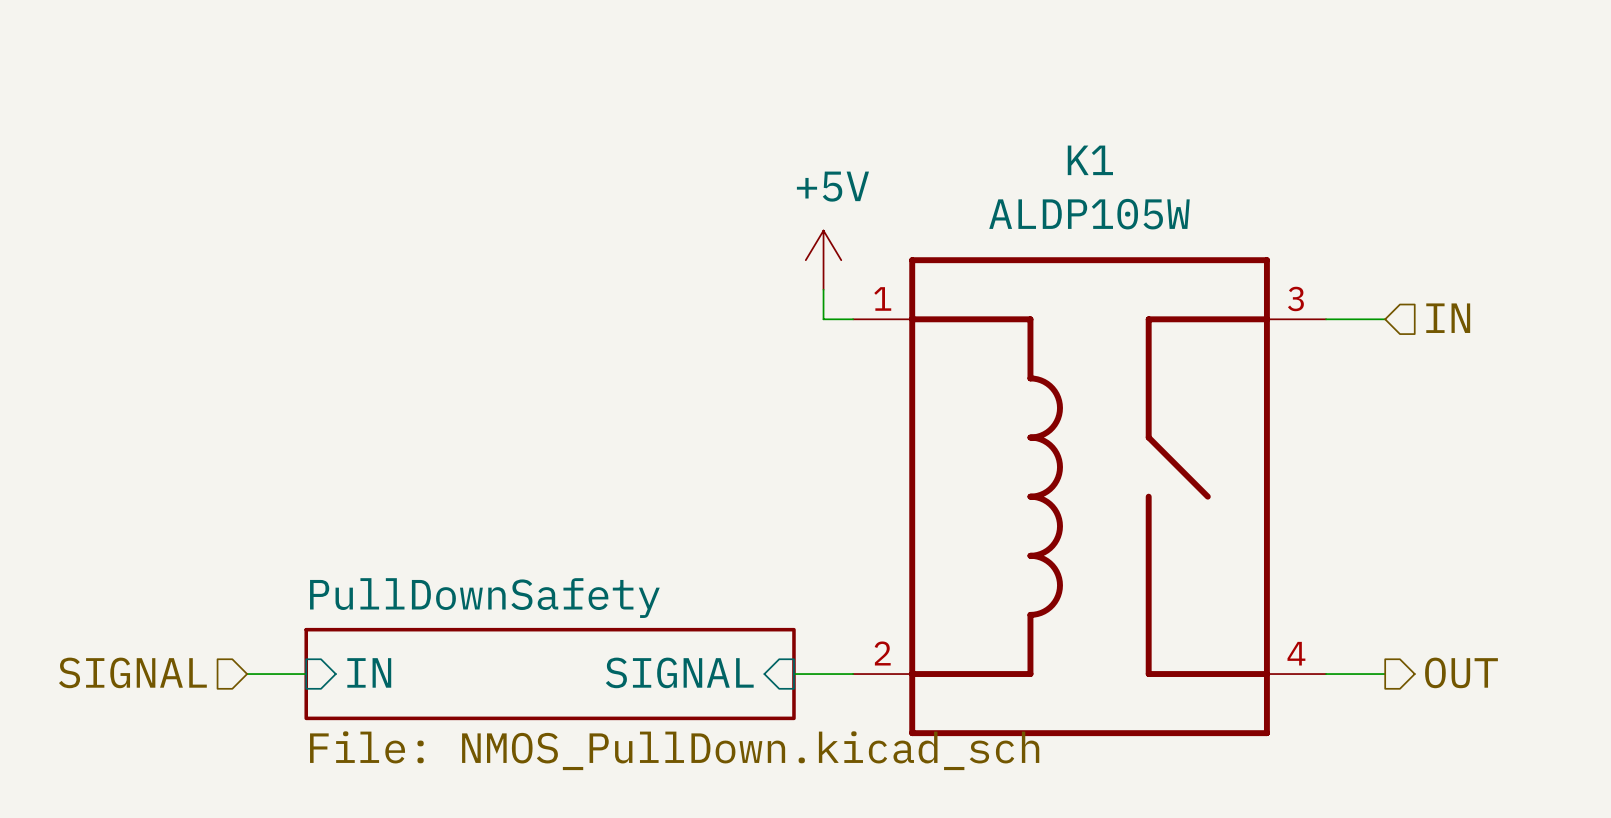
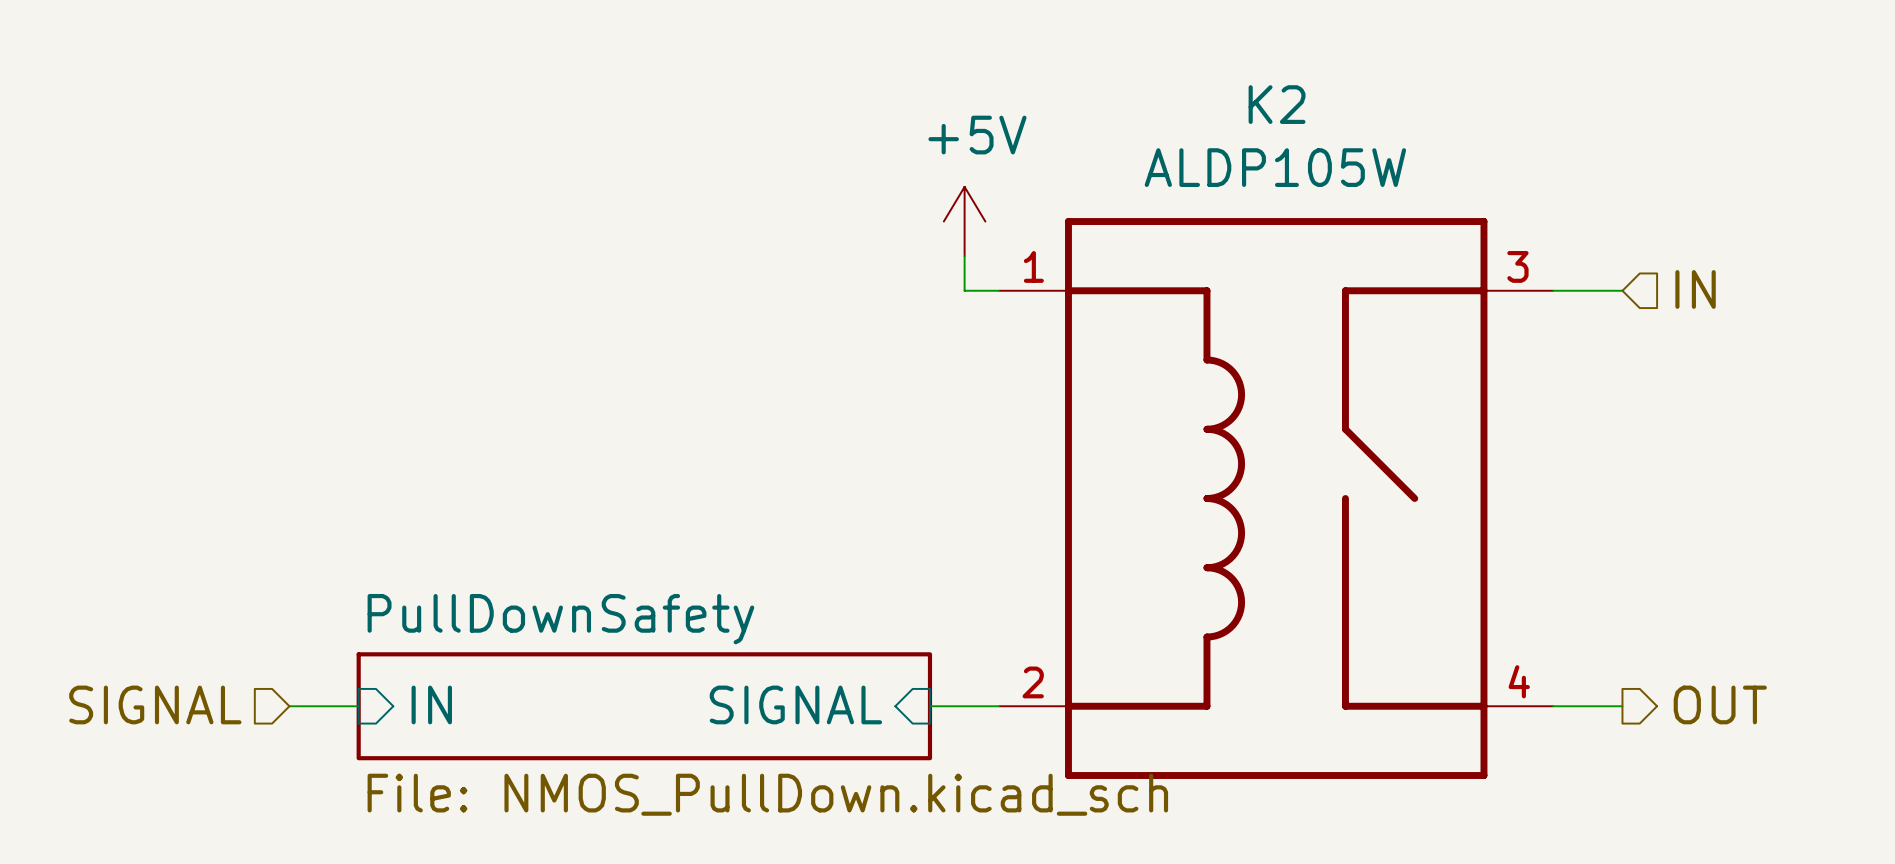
K1 name: K1 (1090, 160) -> K2 (1277, 104)

